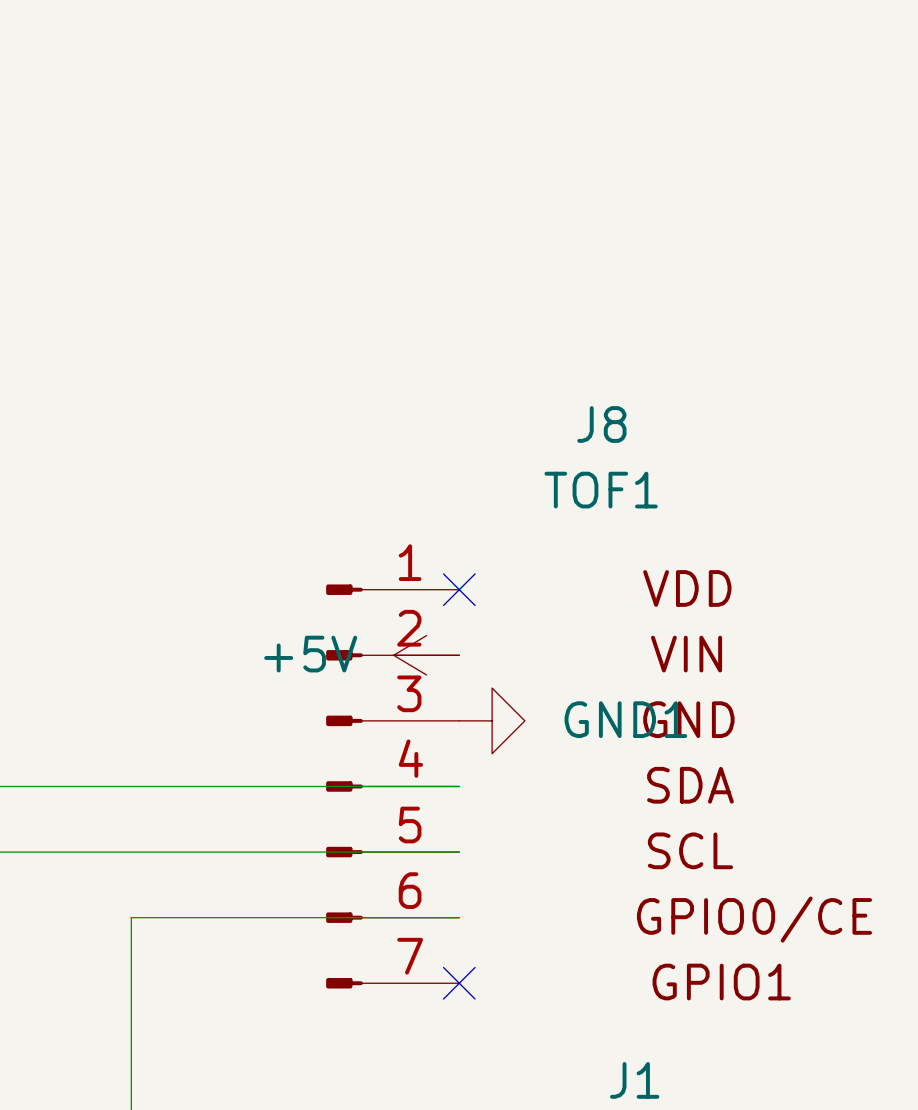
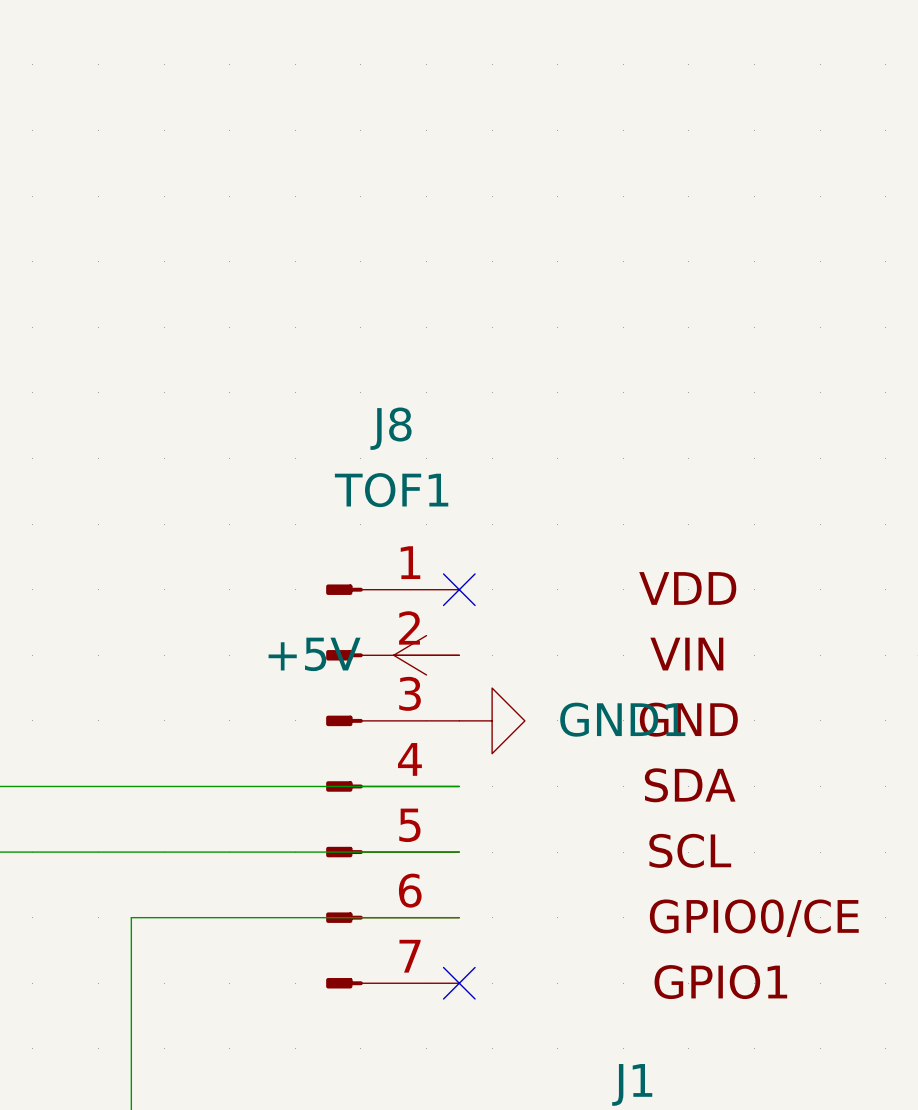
J8 name position: J8 (601, 424) -> J8 (391, 428)
J8 value position: TOF1 (601, 490) -> TOF1 (391, 490)

